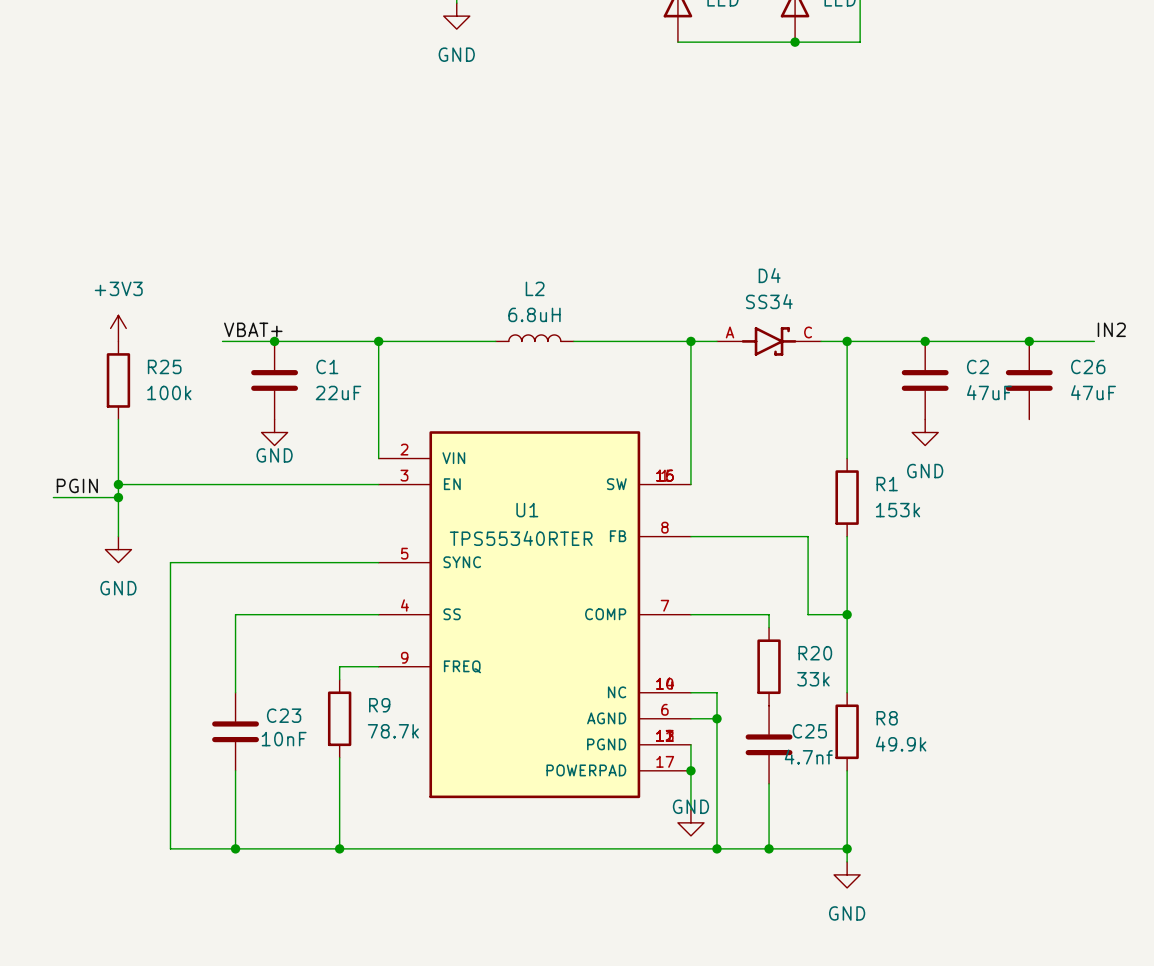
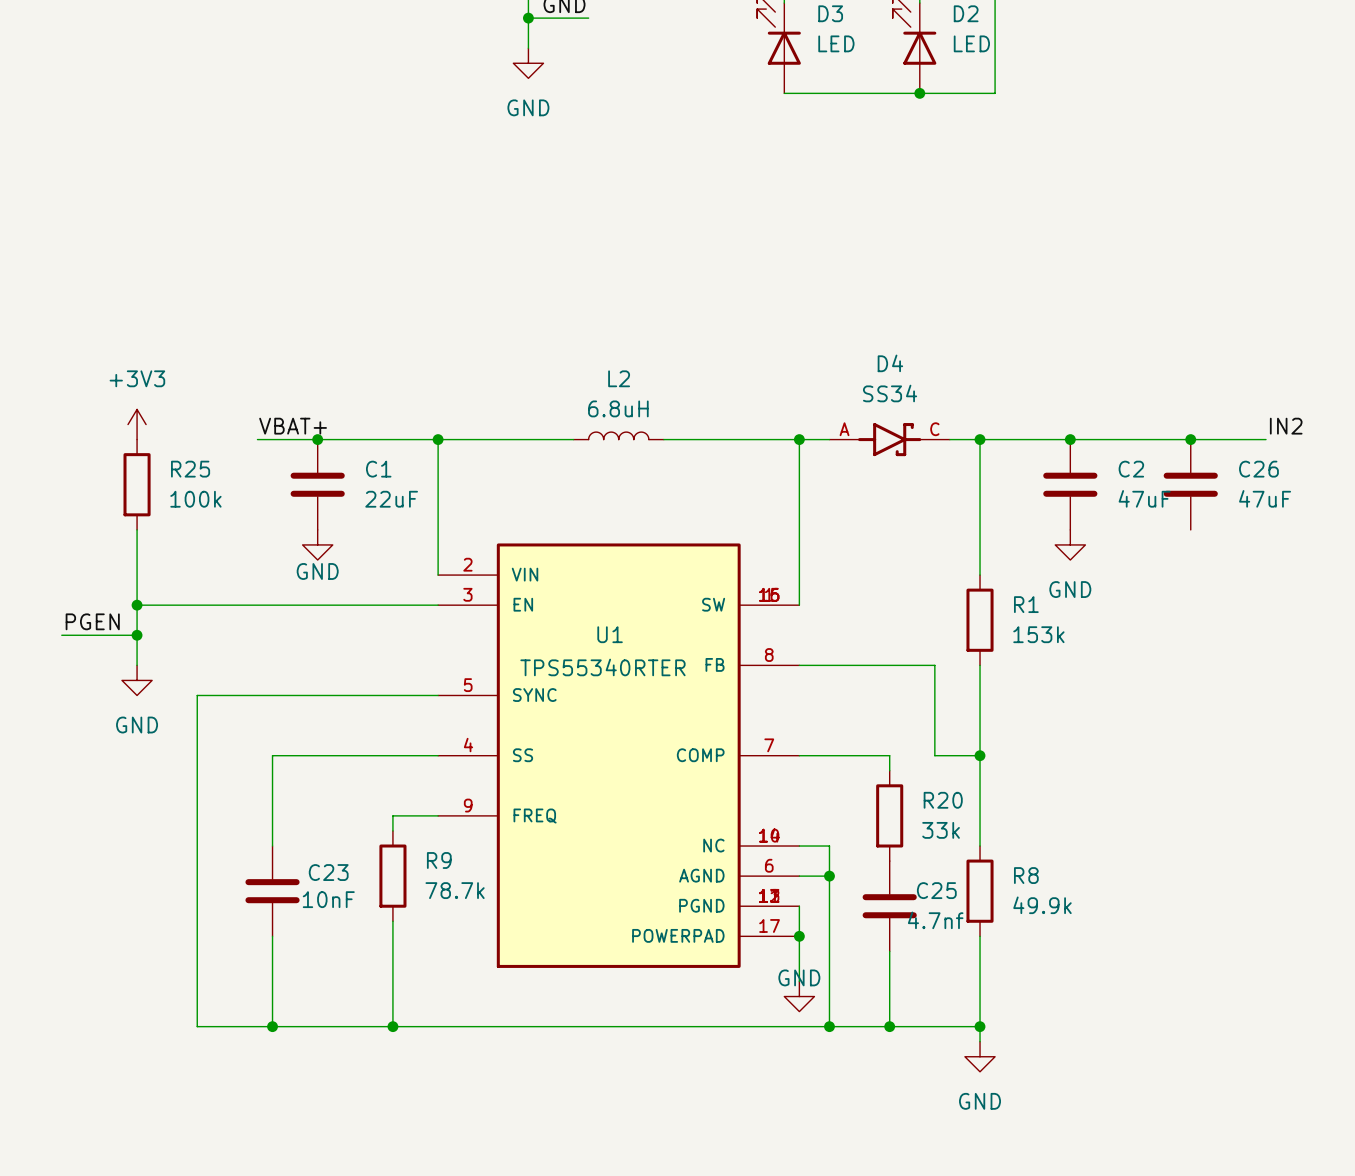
label: PGIN (77, 485) -> PGEN (92, 621)
wire: (53, 497) (118, 497) -> (61, 635) (137, 635)
junction position: (118, 497) -> (137, 635)

